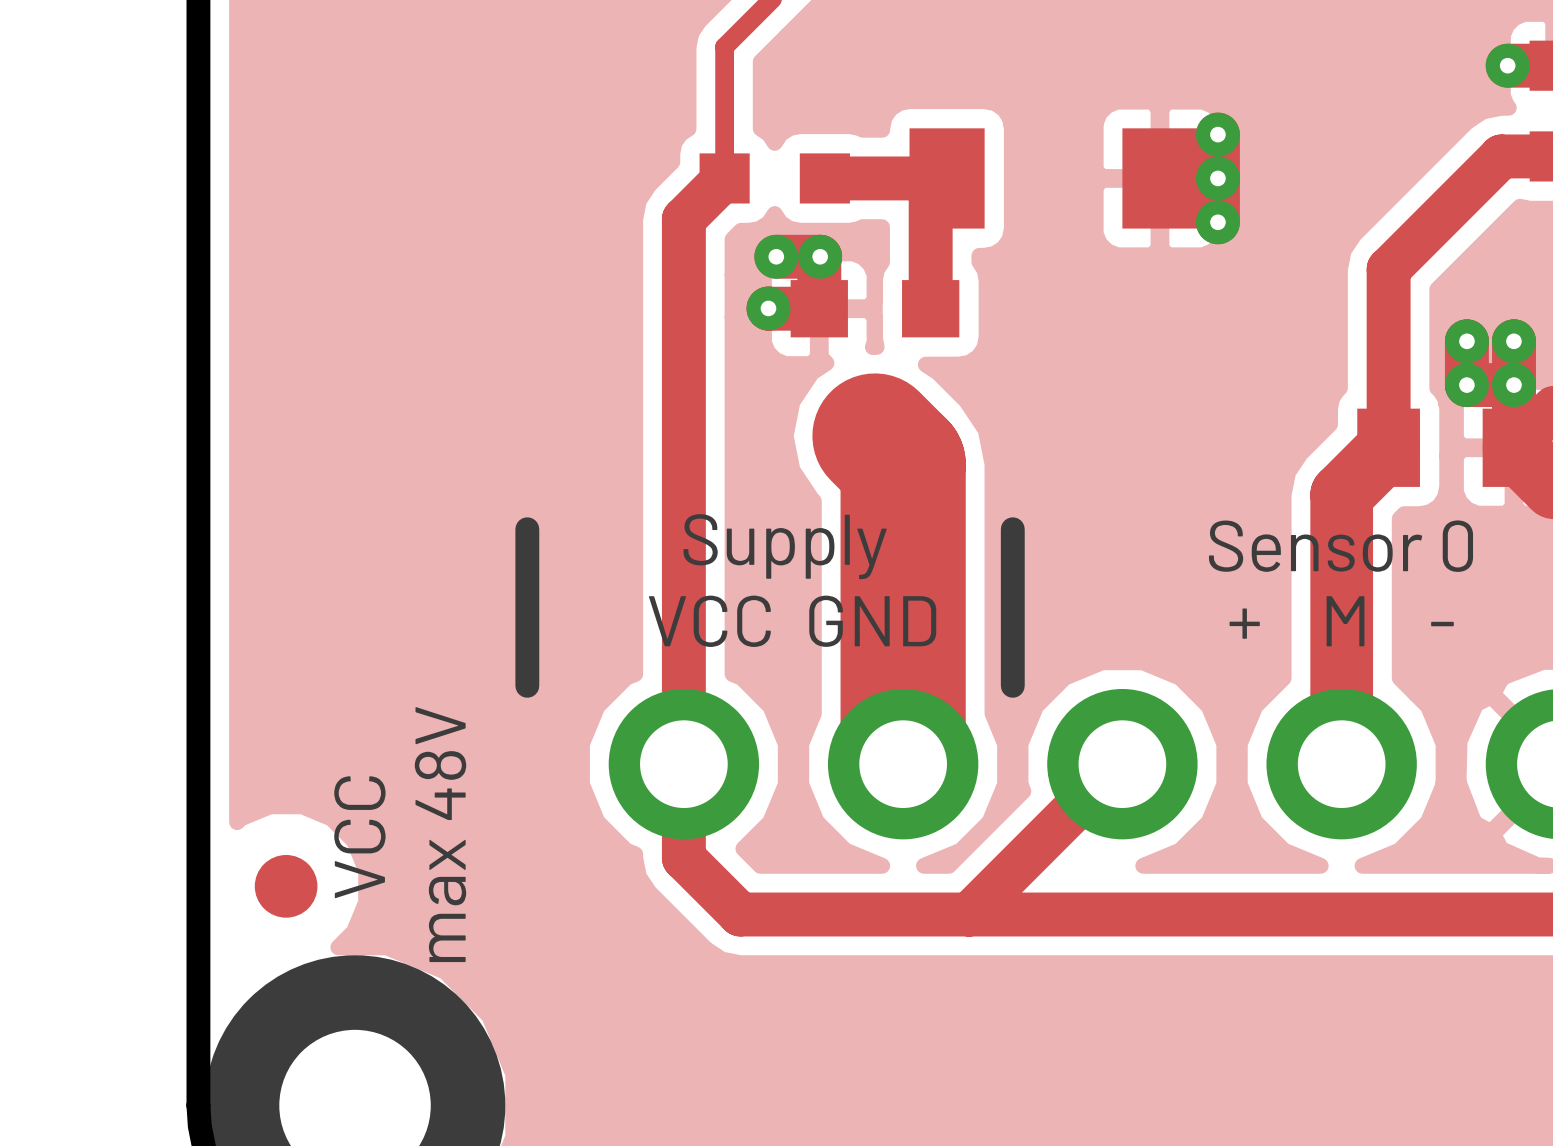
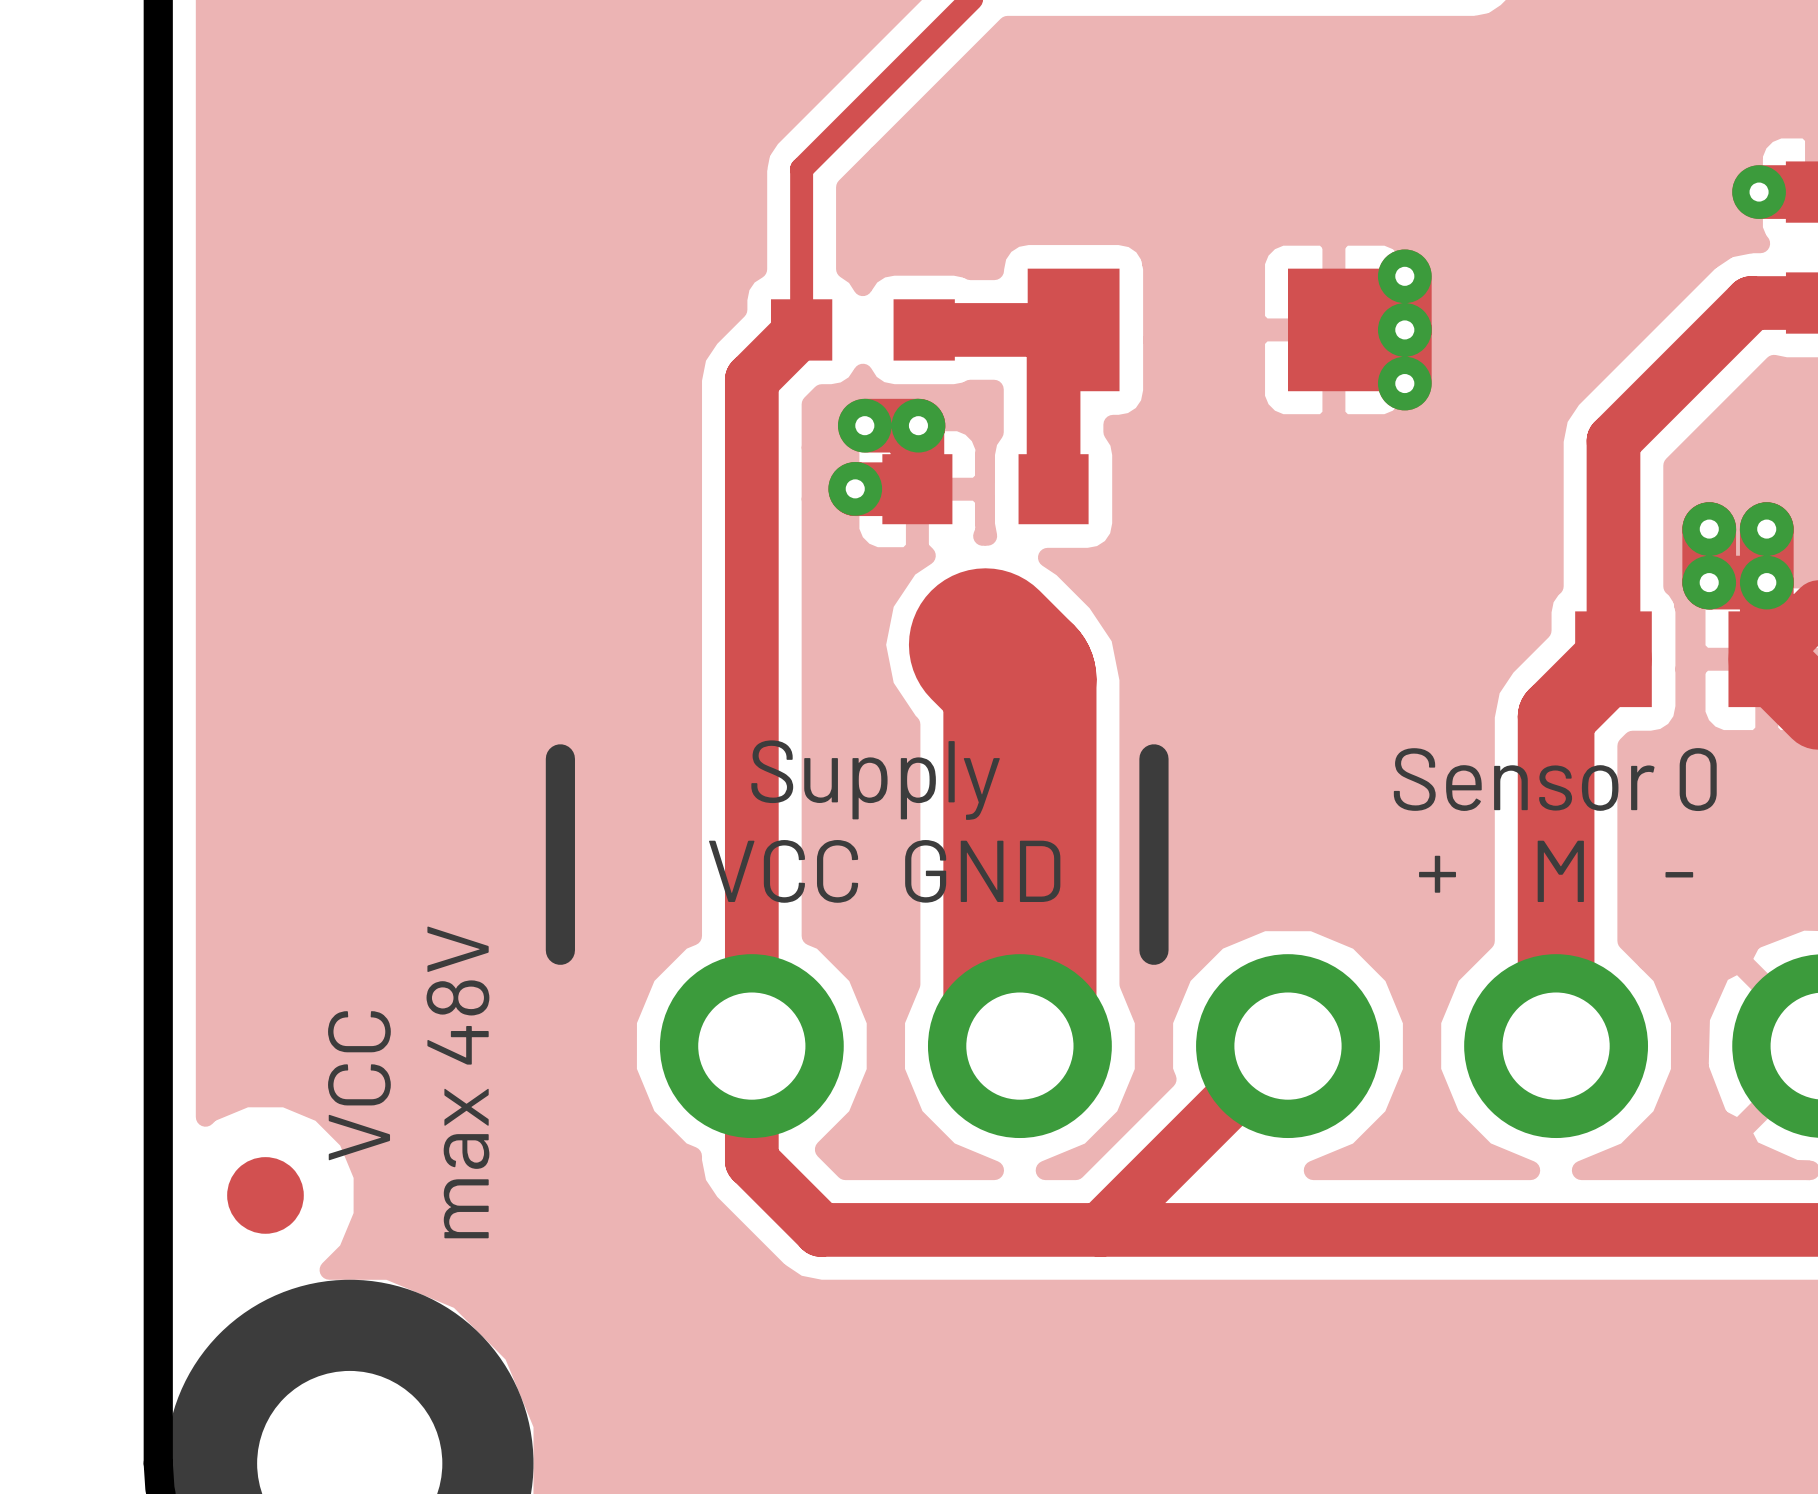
text position: max 48V (440, 834) -> max 48V (457, 1082)
text position: VCC (359, 837) -> VCC (359, 1085)

